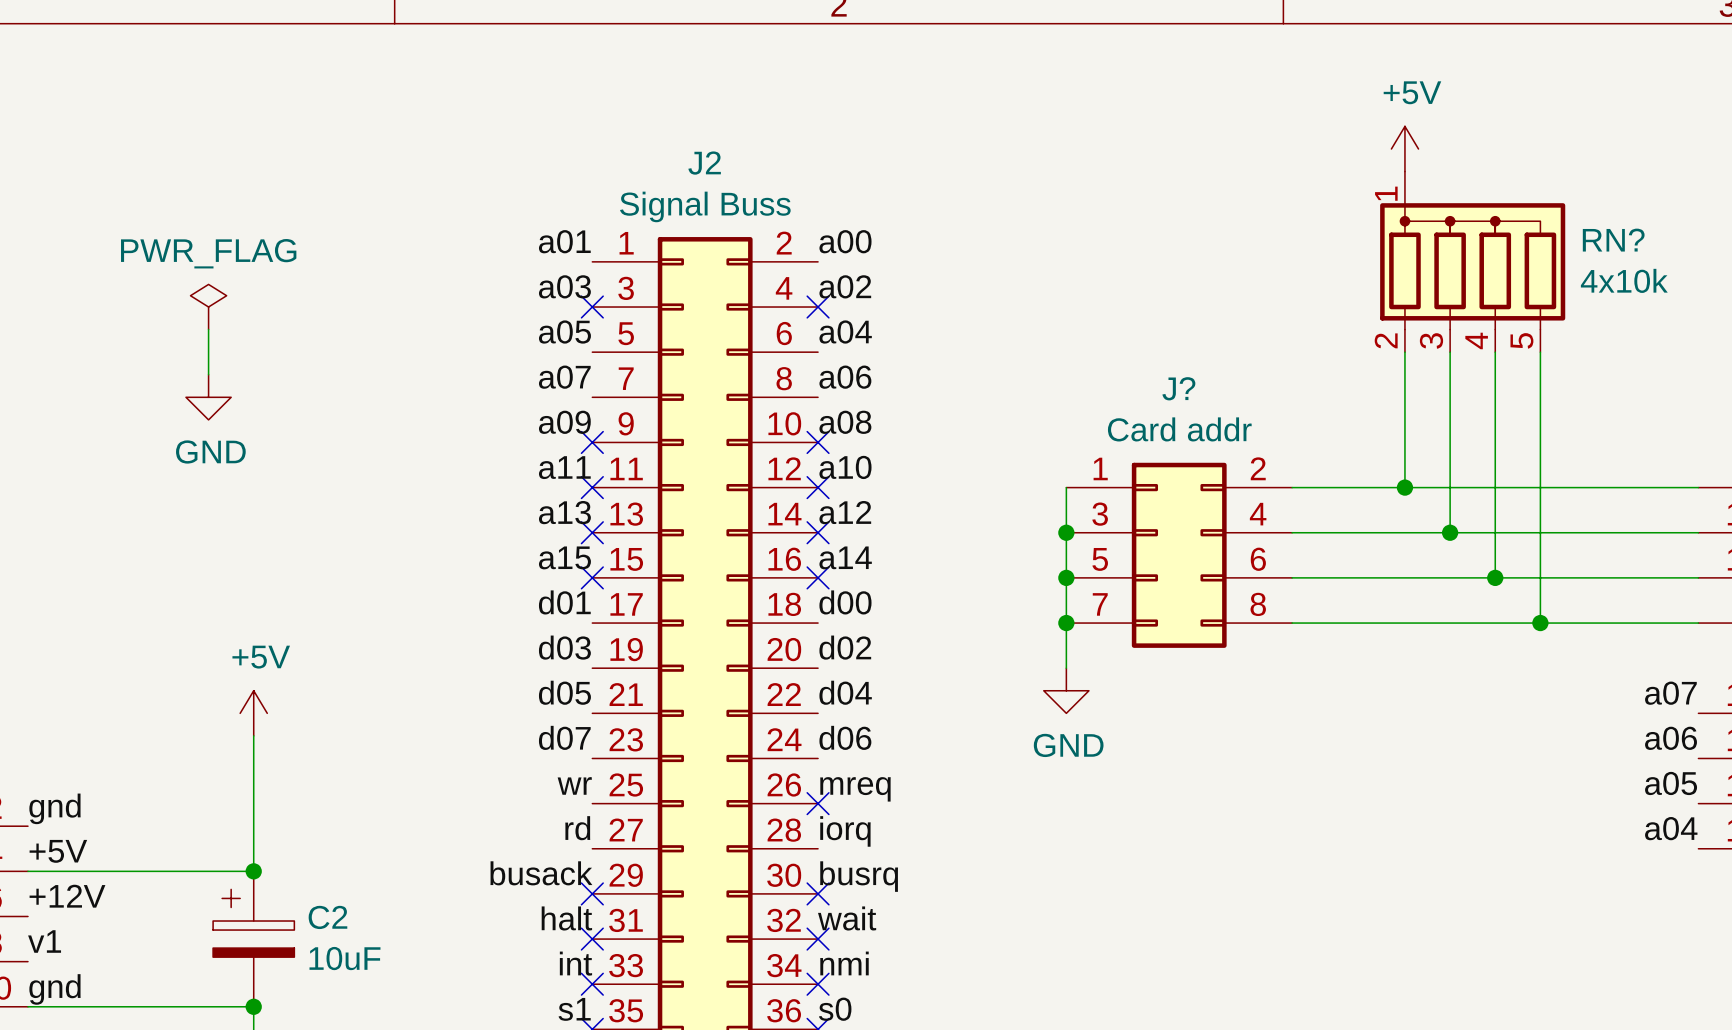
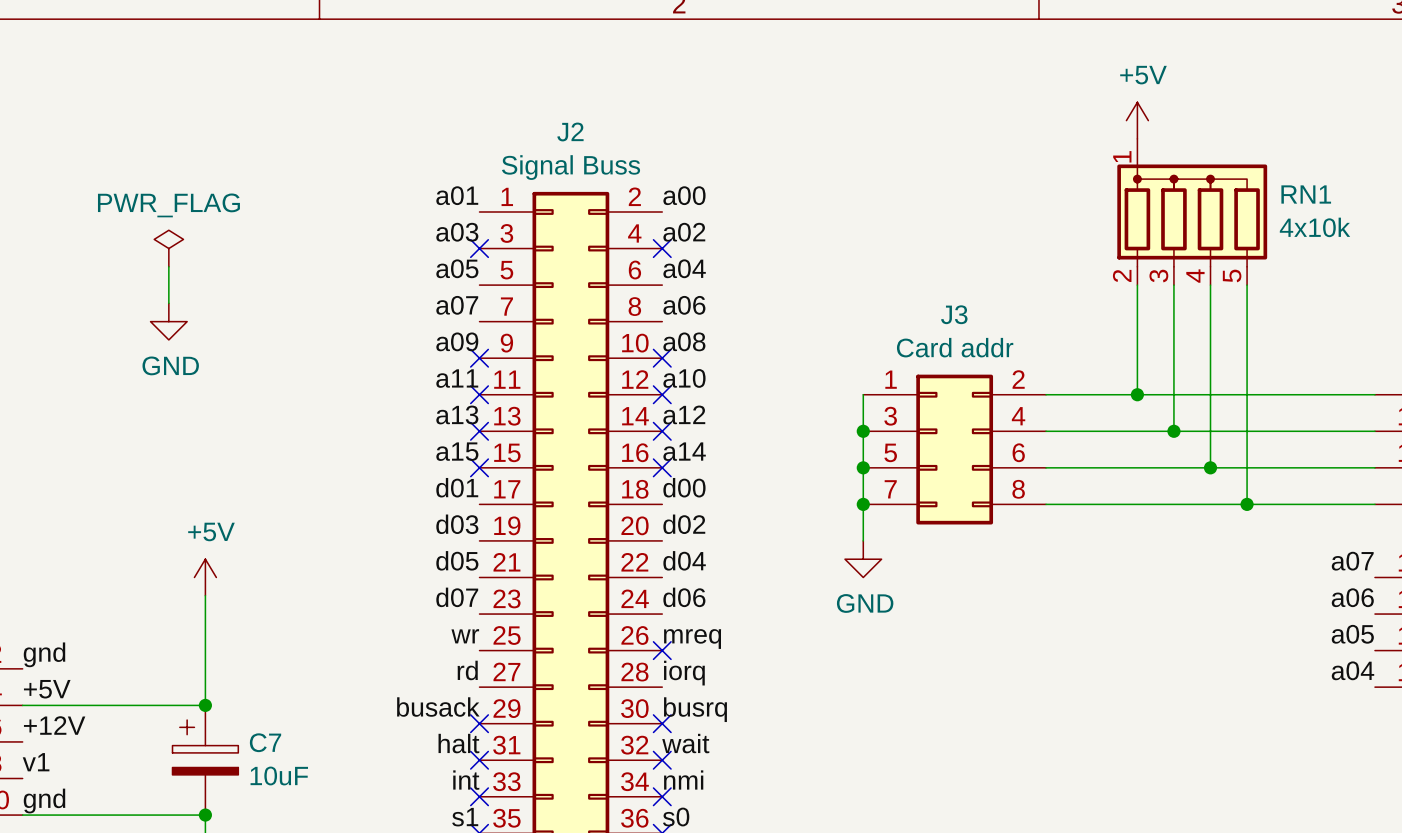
RN? name: RN? (1613, 240) -> RN1 (1306, 194)
J? name: J? (1178, 388) -> J3 (954, 314)
C2 name: C2 (327, 917) -> C7 (265, 742)

